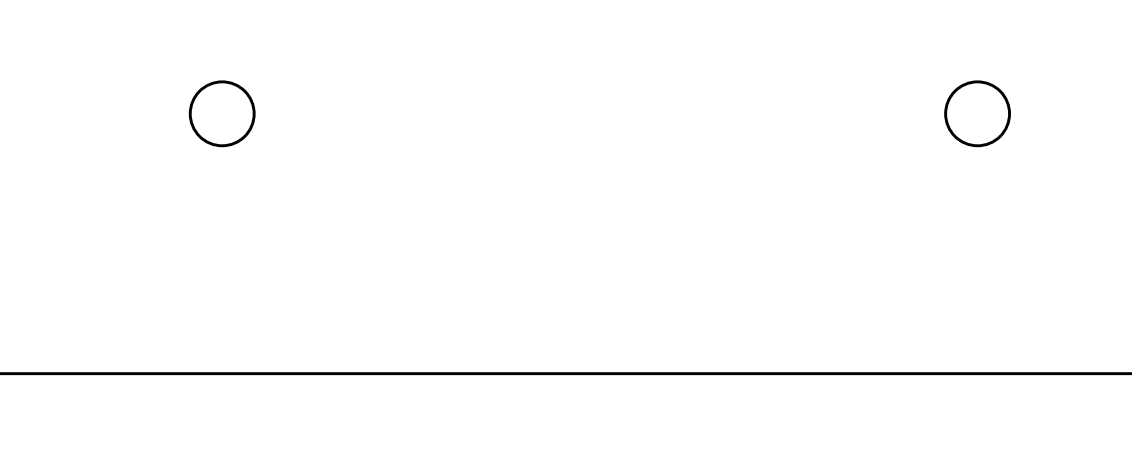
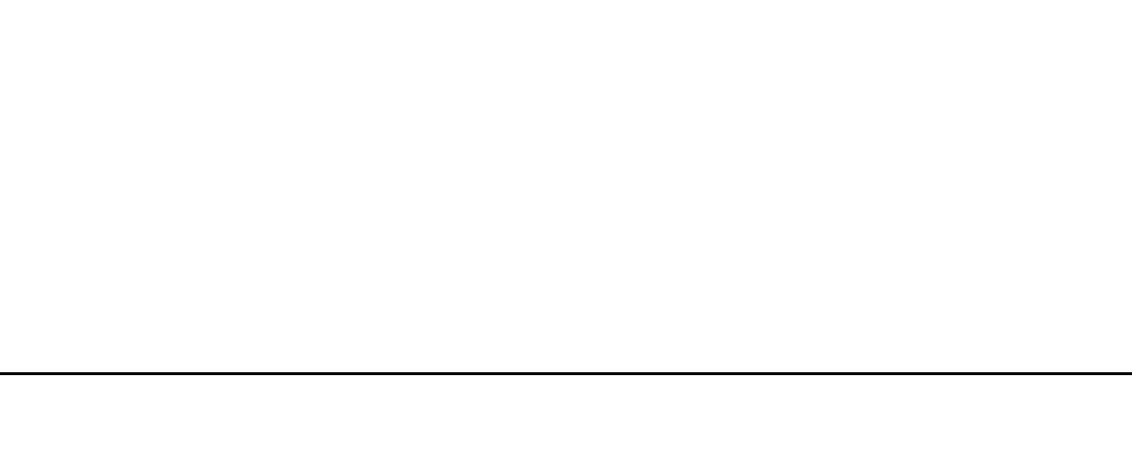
round board edge: [188, 80, 256, 148] -> none
round board edge: [944, 80, 1011, 148] -> none

